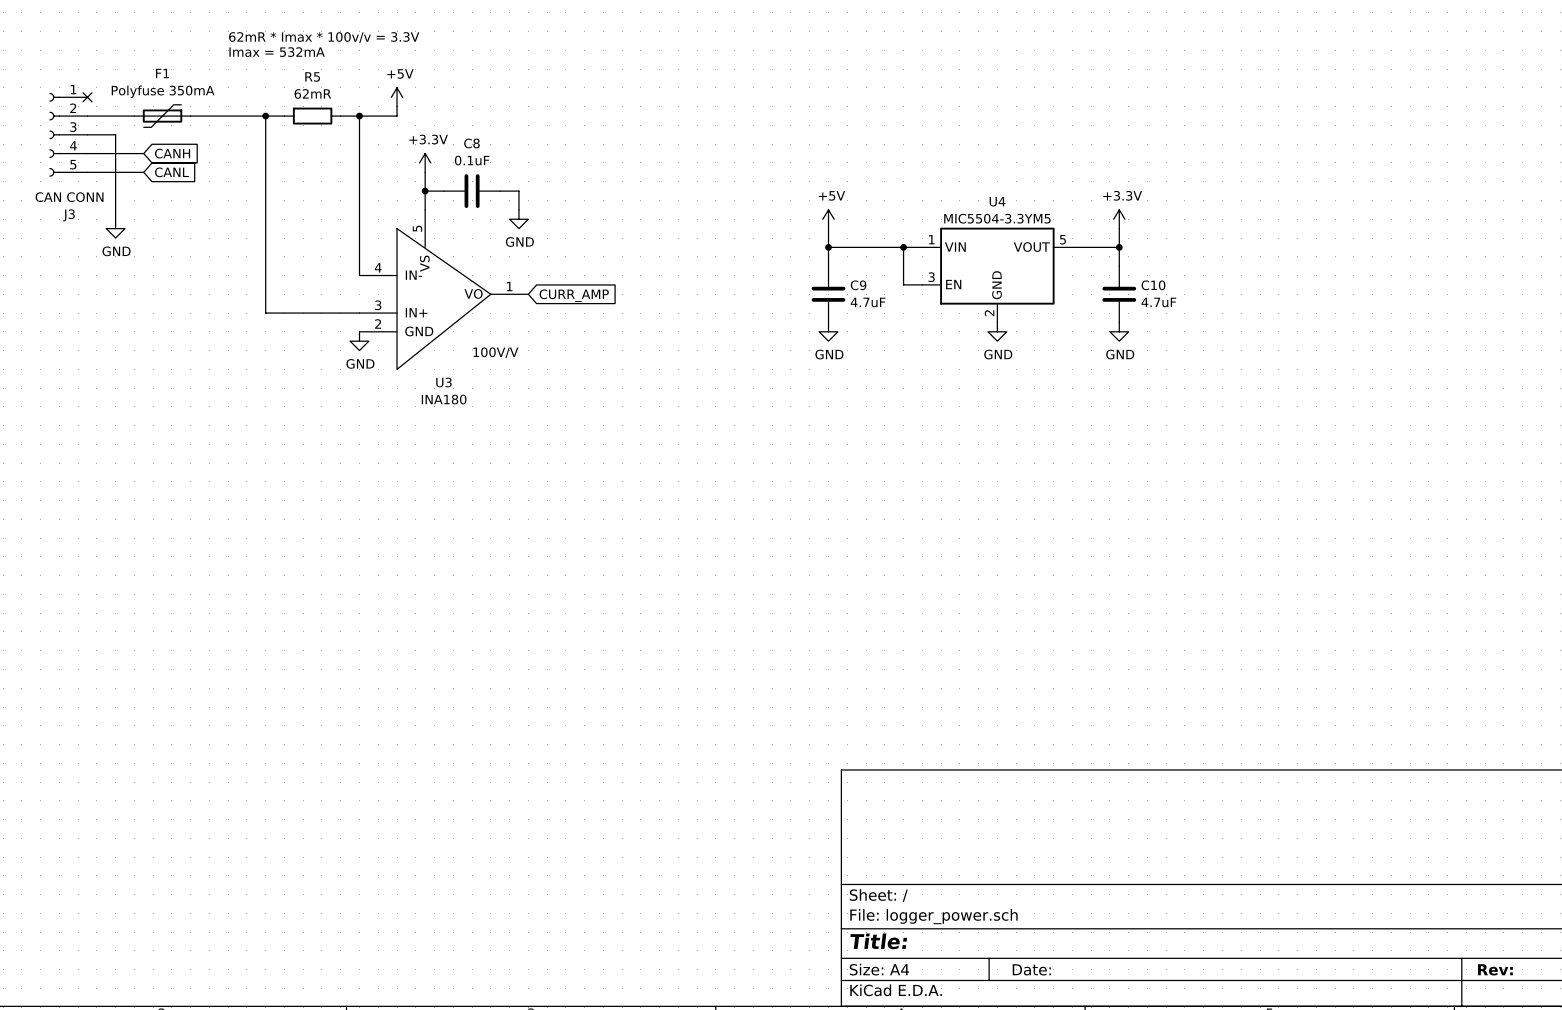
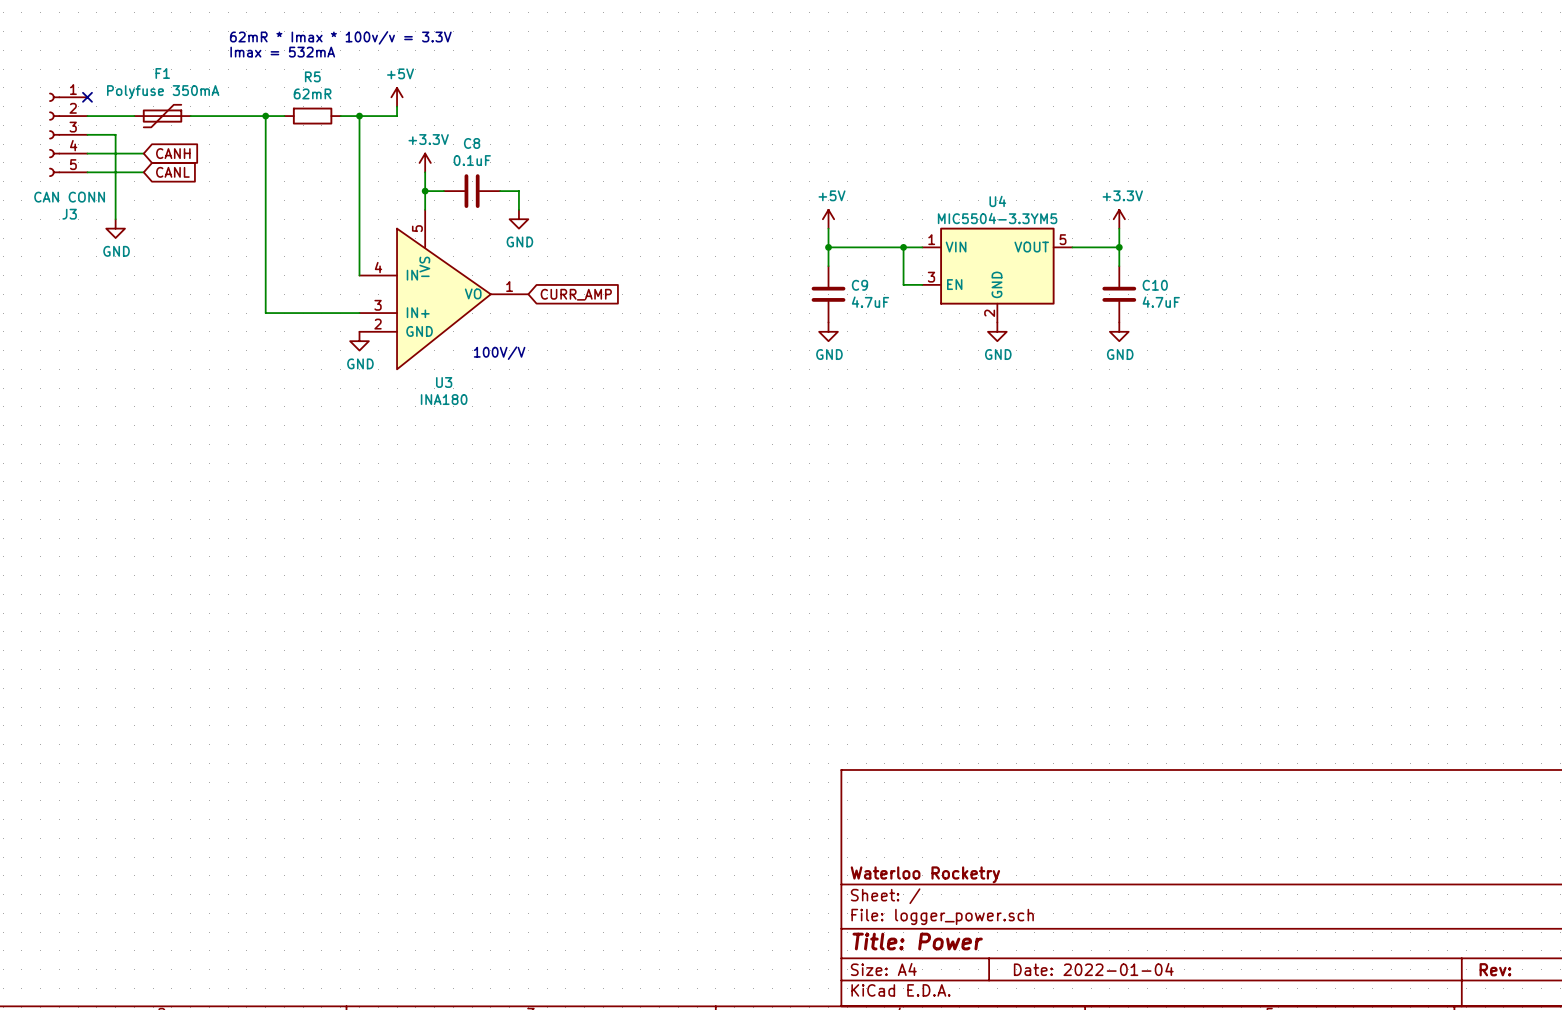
title block: none -> Waterloo Rocketry (925, 874)
title block: Title: (878, 941) -> Title: Power (917, 941)
title block: Date: (1031, 969) -> Date: 2022-01-04 (1093, 969)

